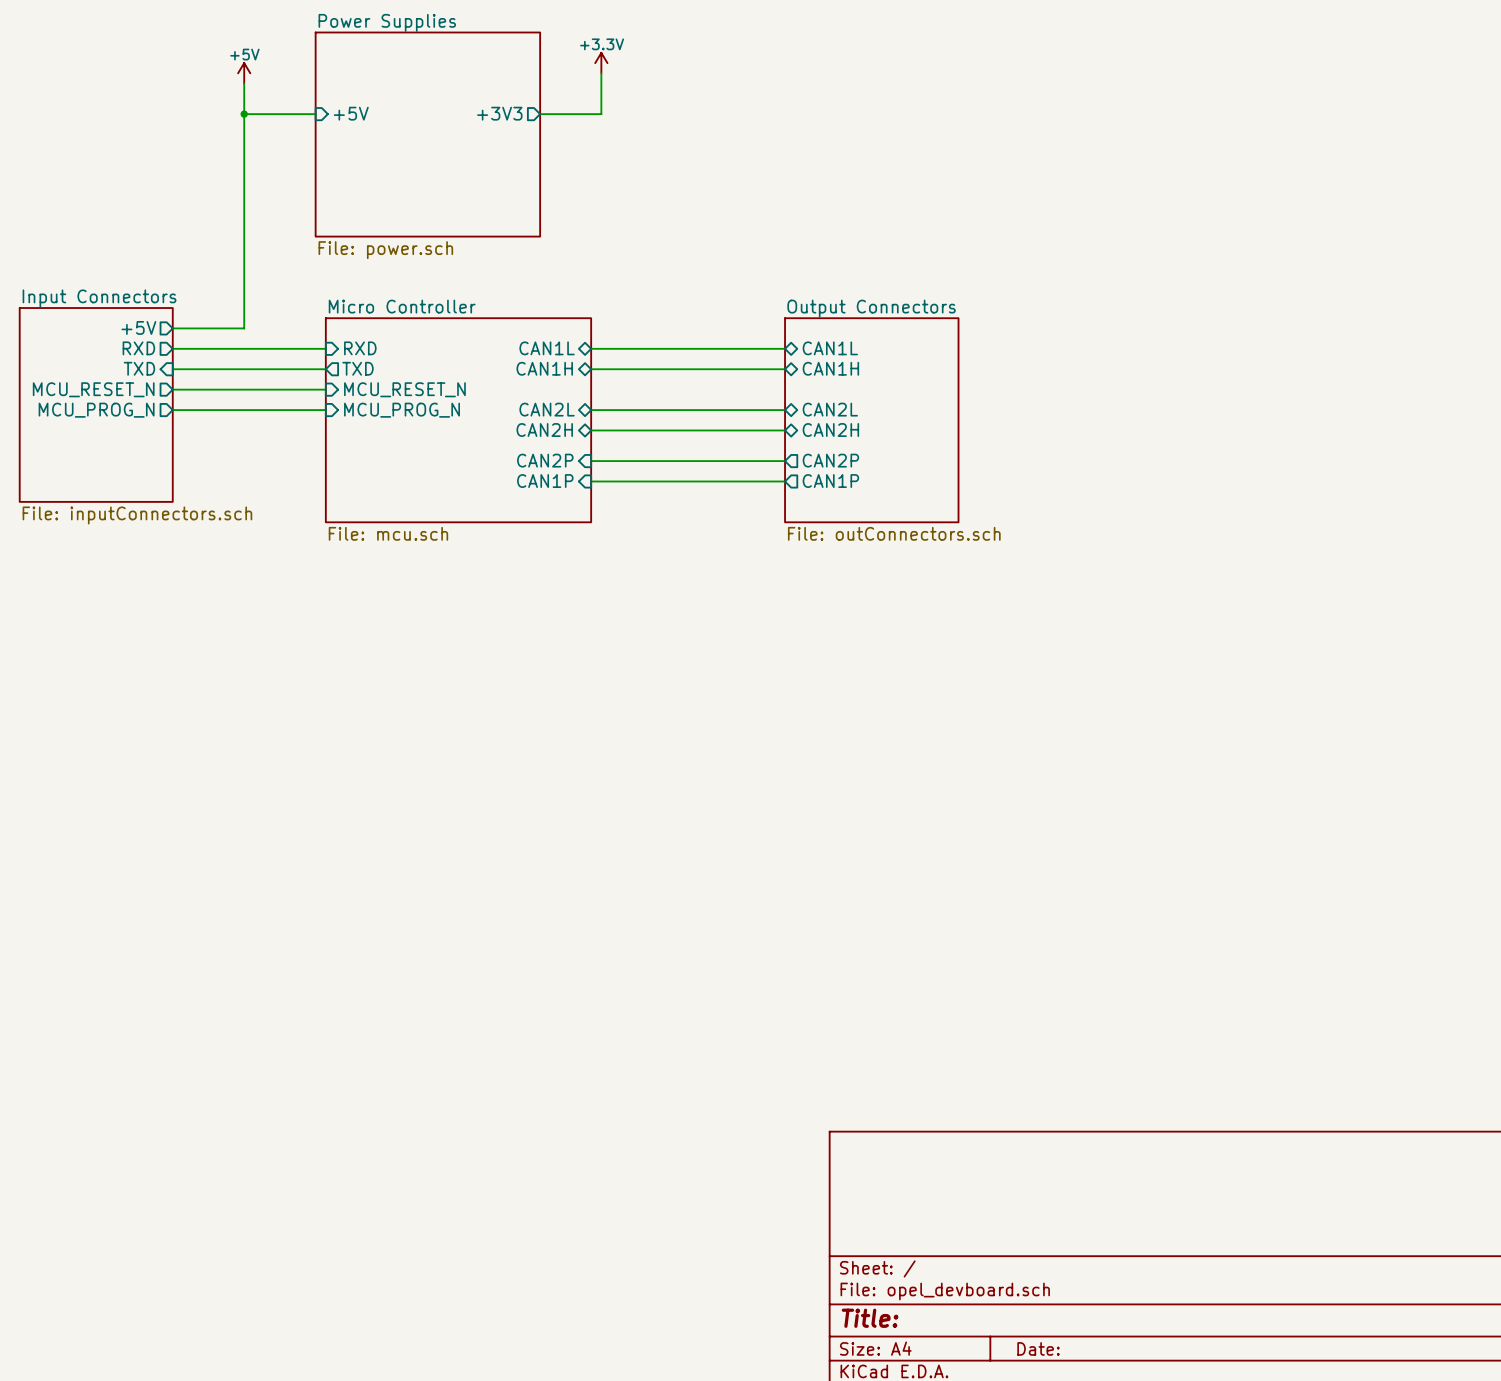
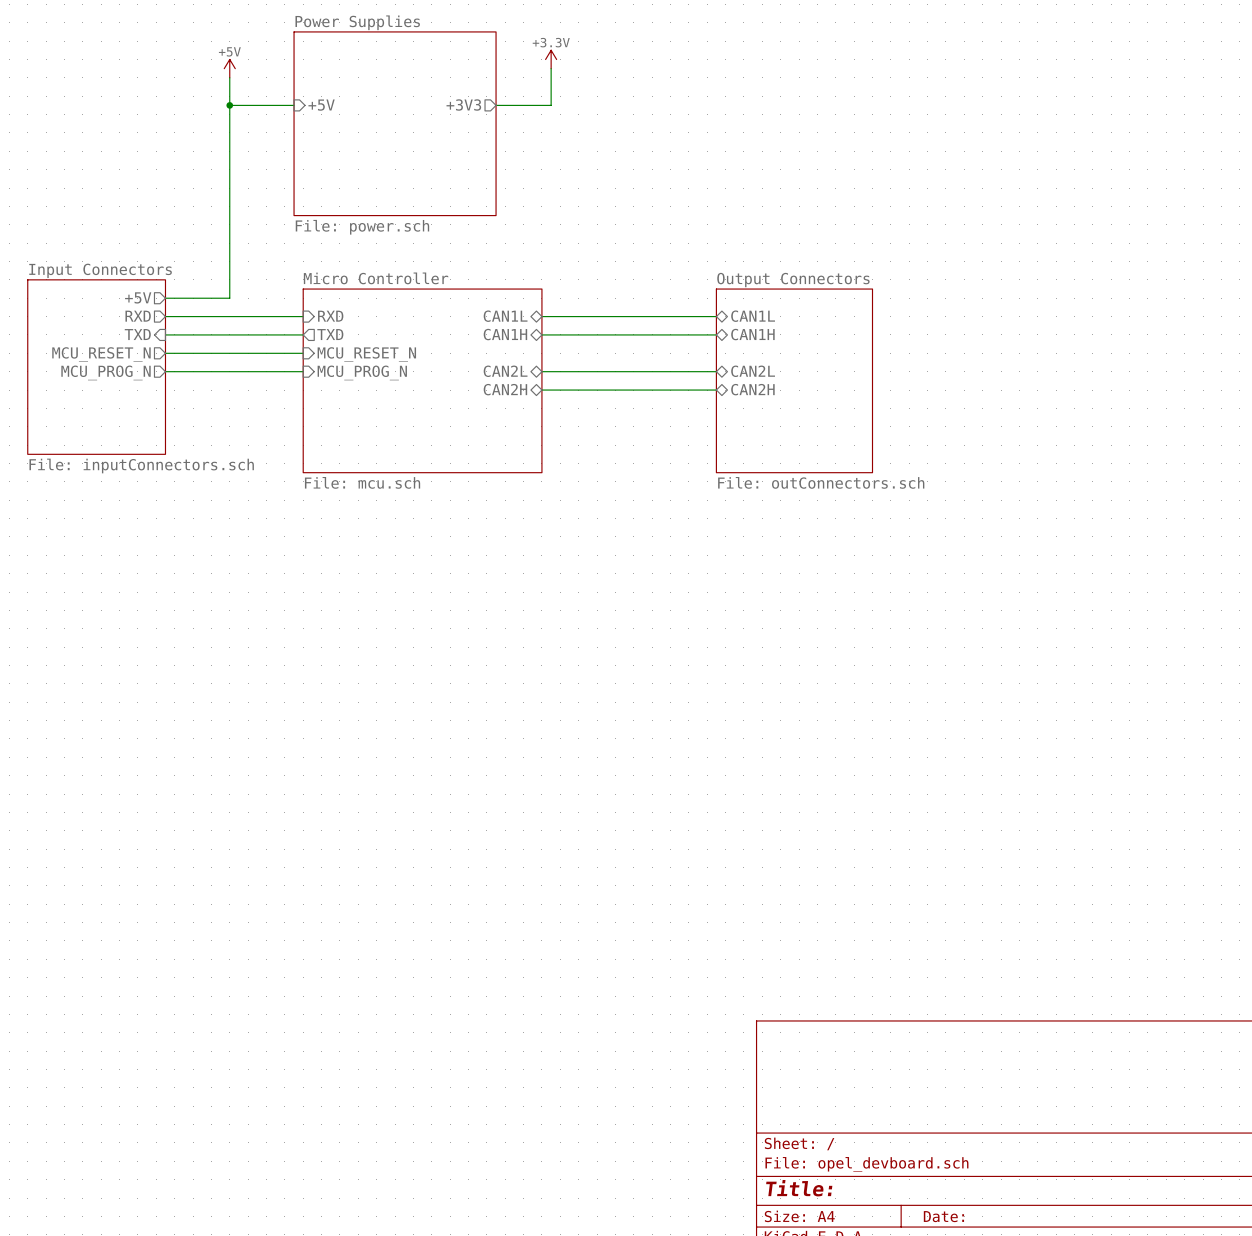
sheet pin: CAN2P (545, 460) -> none
sheet pin: CAN2P (830, 460) -> none
wire: (591, 461) (785, 461) -> none
sheet pin: CAN1P (545, 481) -> none
wire: (591, 481) (785, 481) -> none
sheet pin: CAN1P (830, 481) -> none

